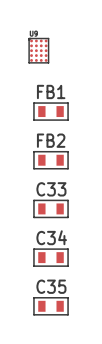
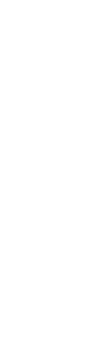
part: (38, 50) -> none
FB1: (51, 111) -> none
FB2: (51, 160) -> none
C33: (51, 208) -> none
C34: (51, 257) -> none
C35: (51, 306) -> none

